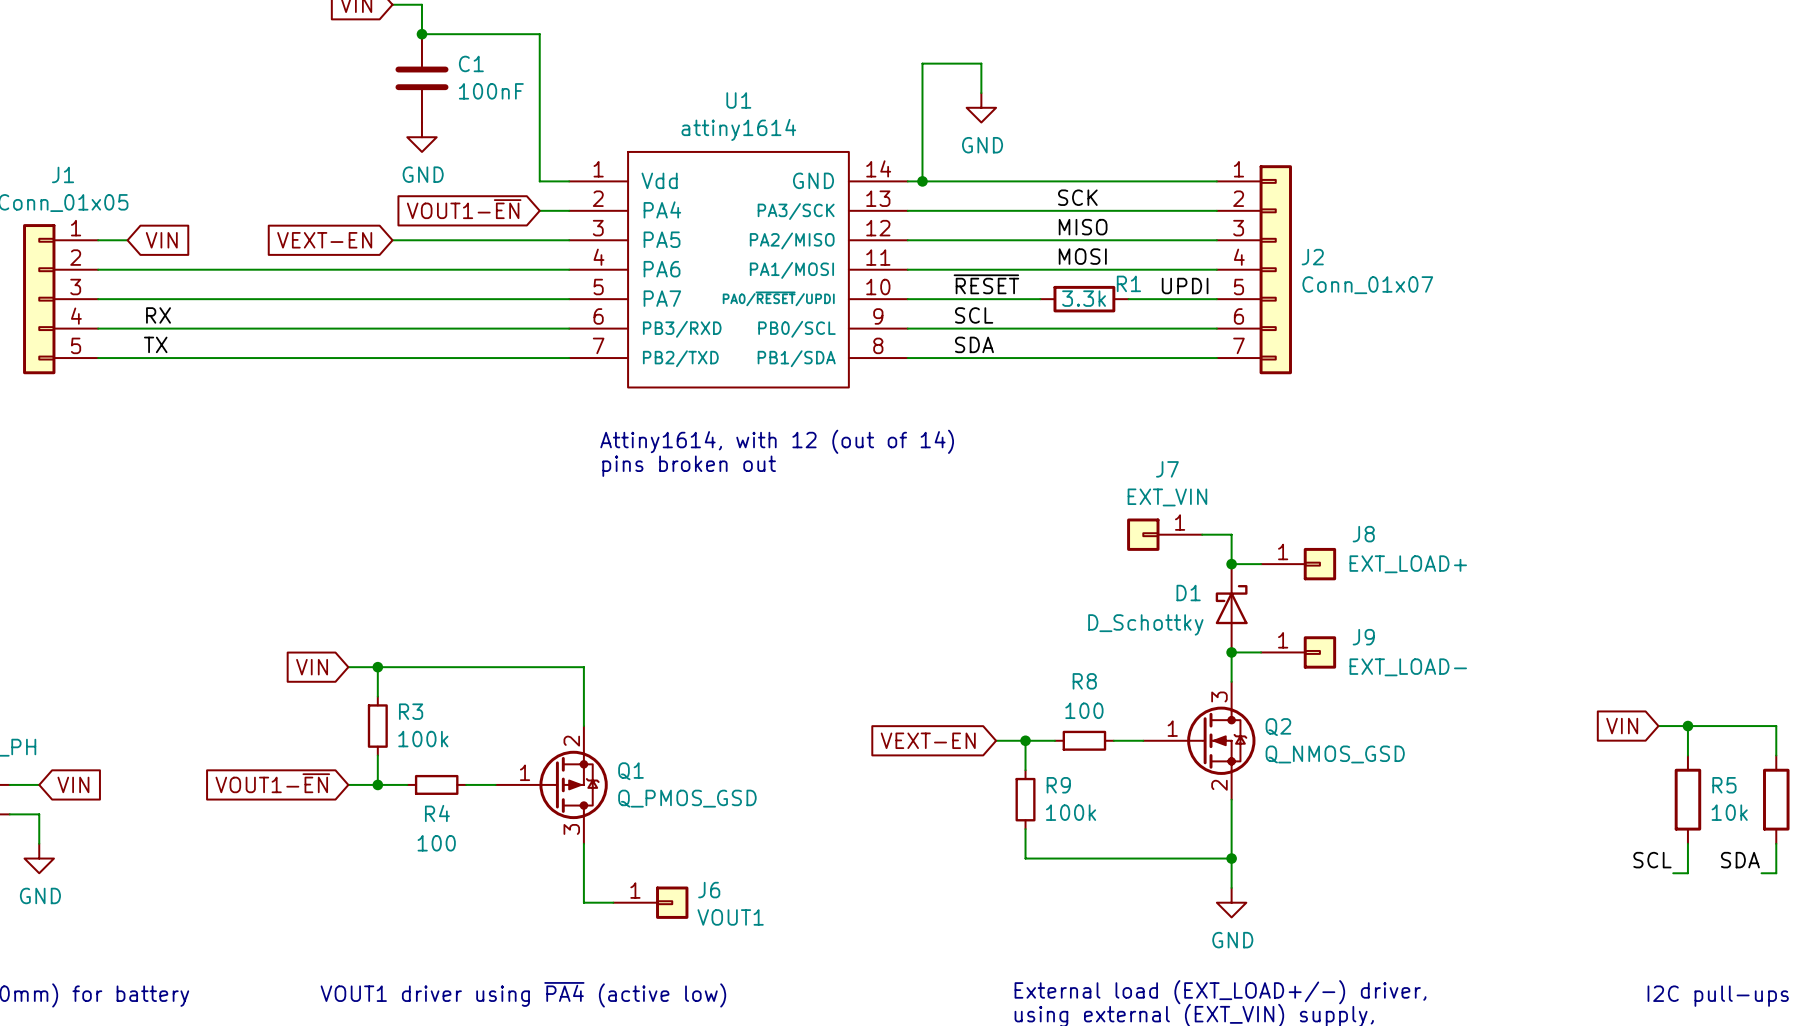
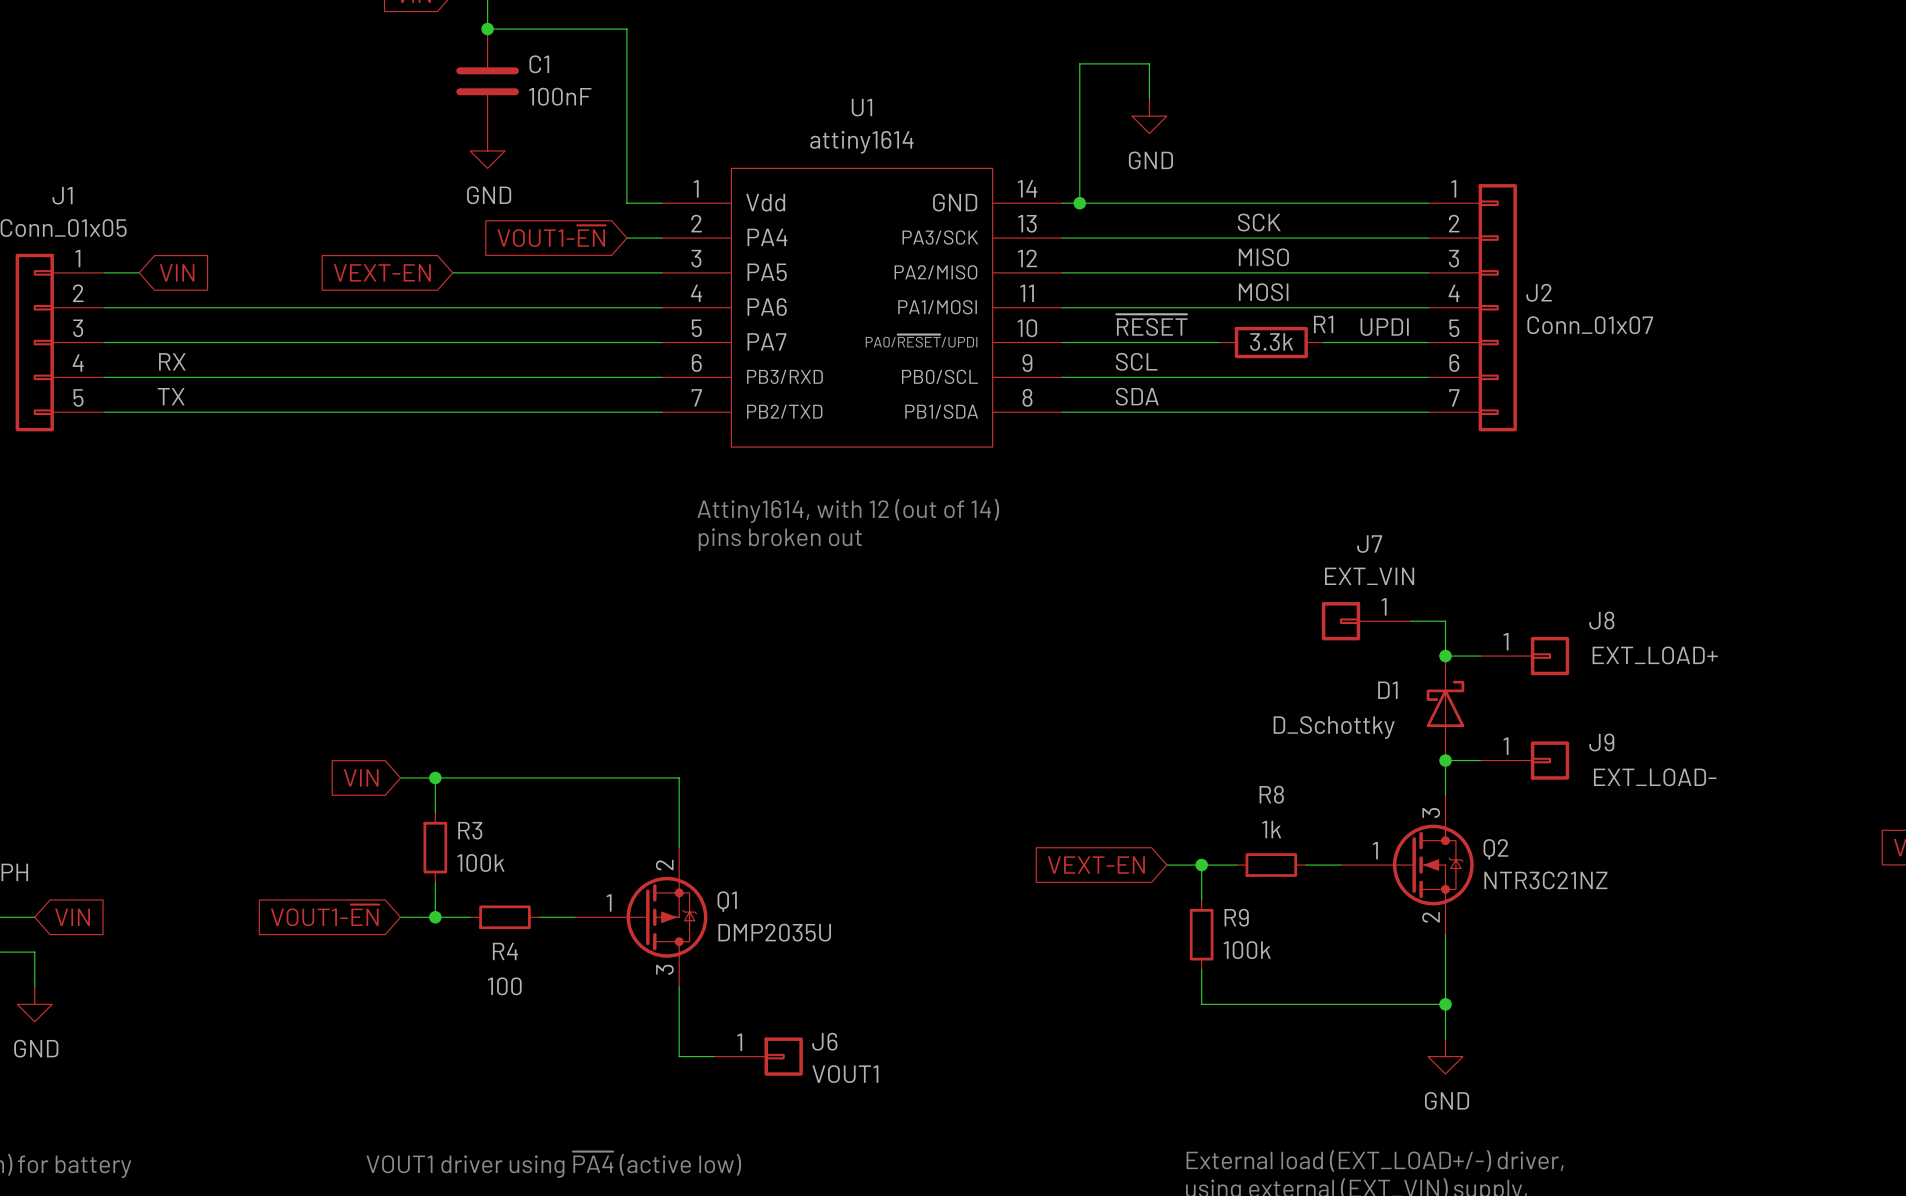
R8 value: 100 (1084, 710) -> 1k (1271, 829)
Q2 value: Q_NMOS_GSD (1335, 754) -> NTR3C21NZ (1545, 880)
Q1 value: Q_PMOS_GSD (687, 798) -> DMP2035U (774, 932)

